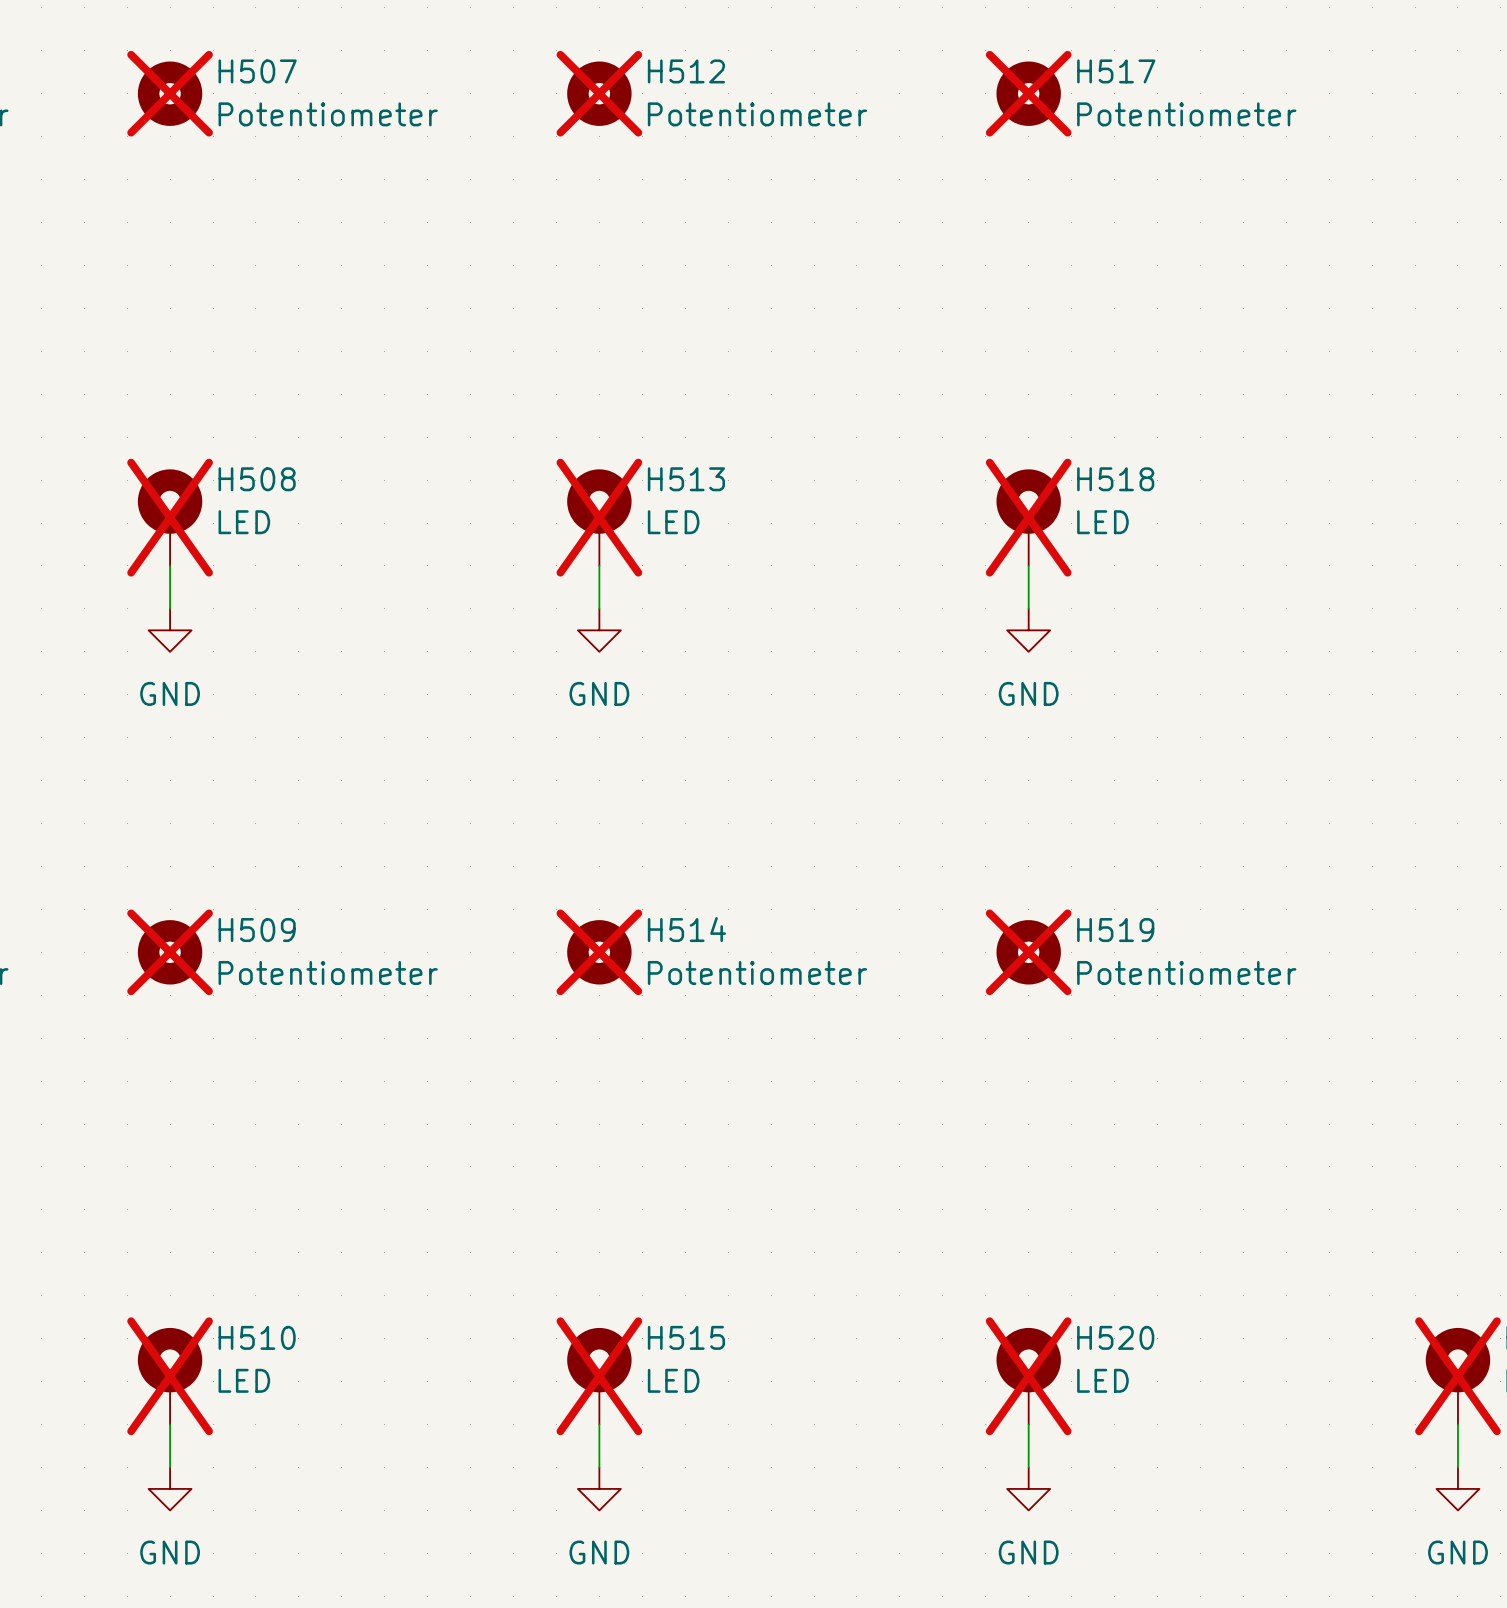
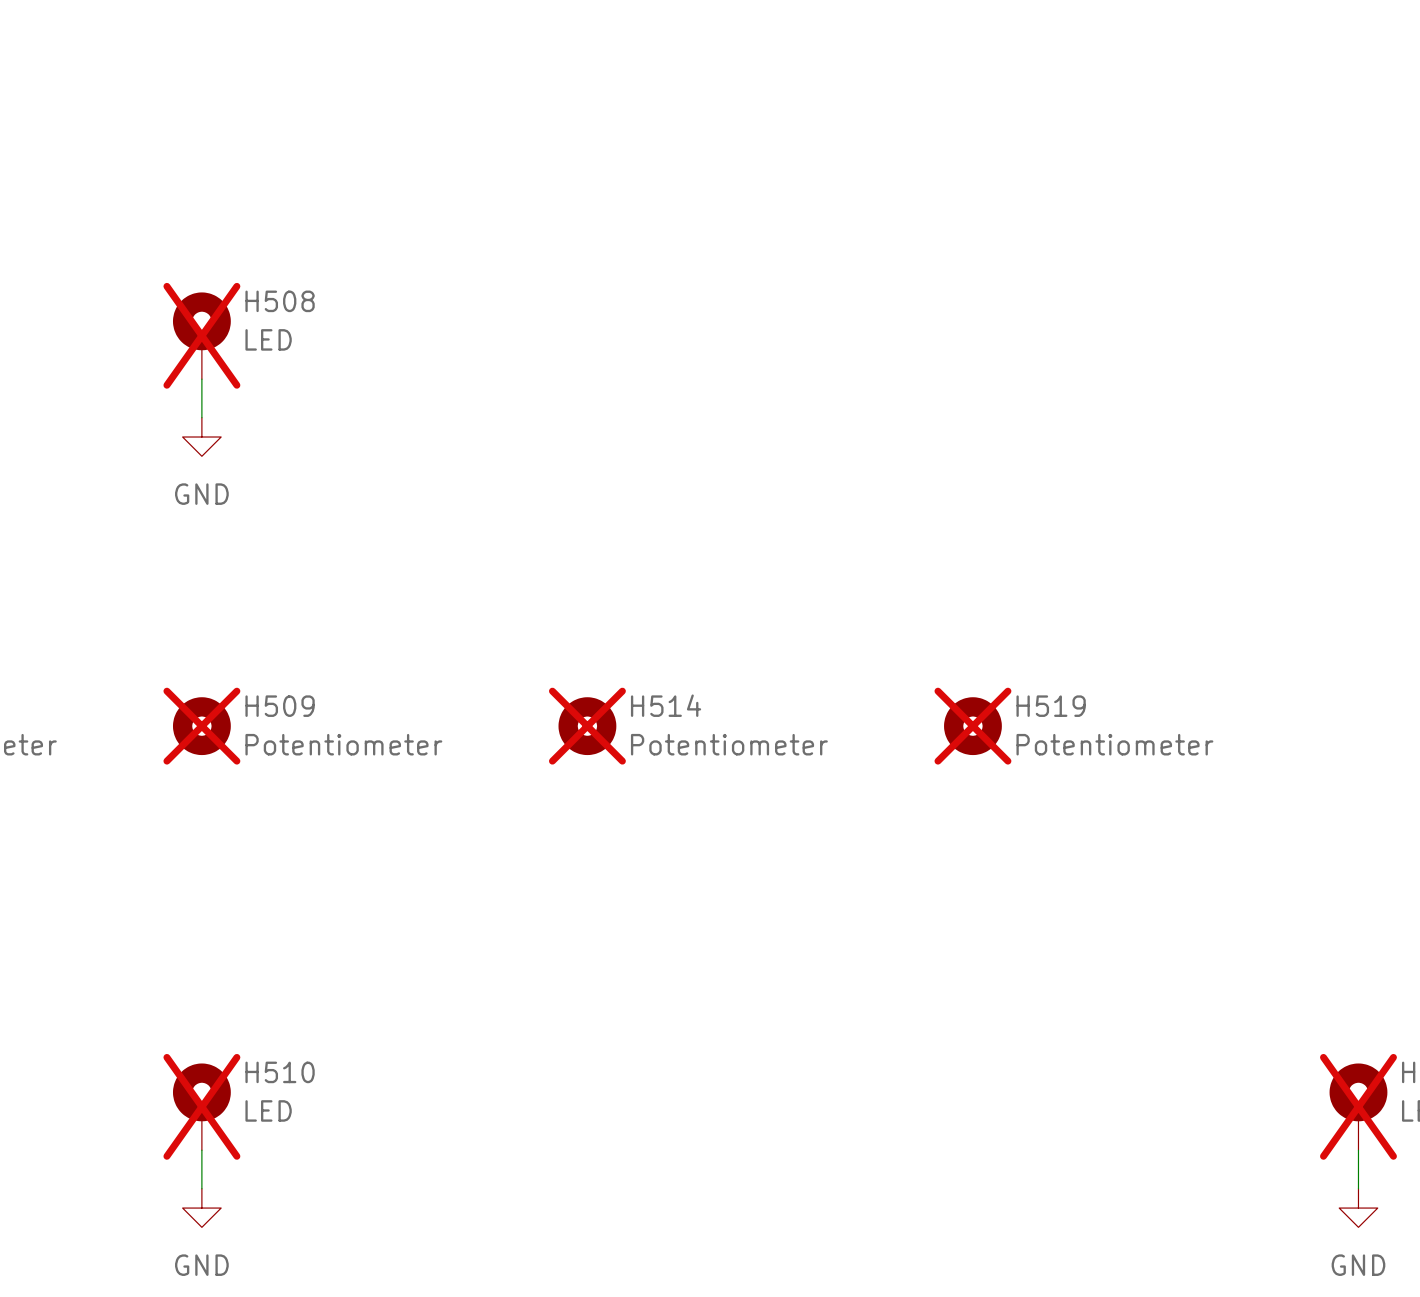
H513: LED (599, 517) -> none
H518: LED (1028, 517) -> none
wire: (599, 565) (599, 608) -> none
wire: (1028, 565) (1028, 608) -> none
power symbol: GND (599, 630) -> none
power symbol: GND (1028, 630) -> none
H515: LED (599, 1376) -> none
H520: LED (1028, 1376) -> none
wire: (599, 1424) (599, 1467) -> none
wire: (1028, 1424) (1028, 1467) -> none
power symbol: GND (599, 1488) -> none
power symbol: GND (1028, 1488) -> none

